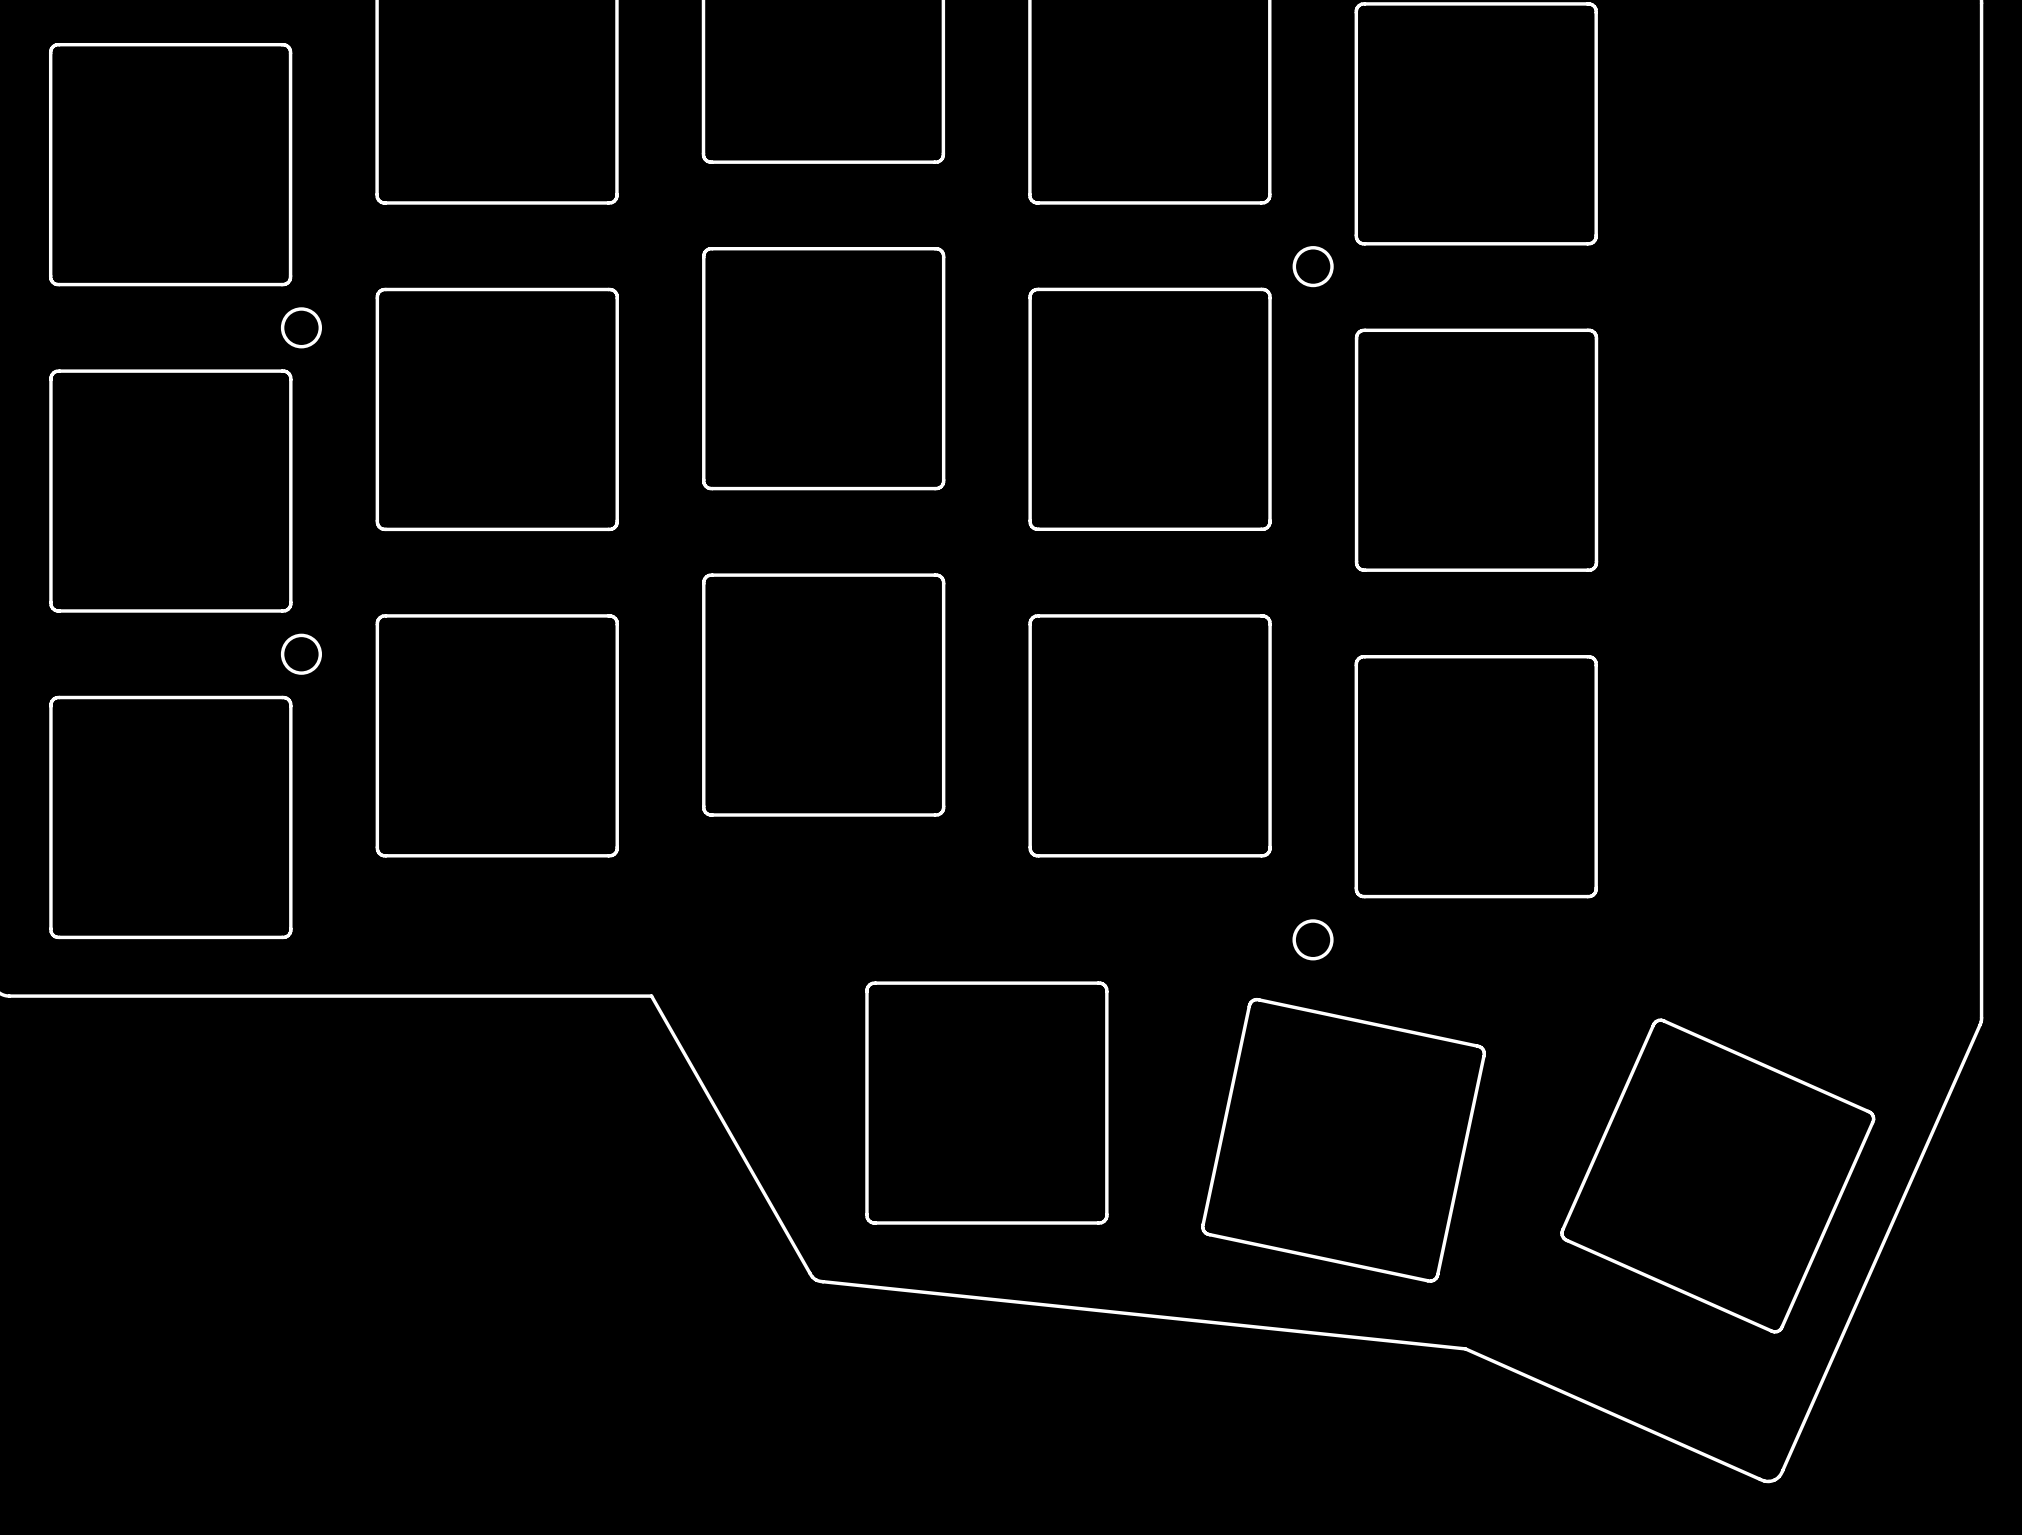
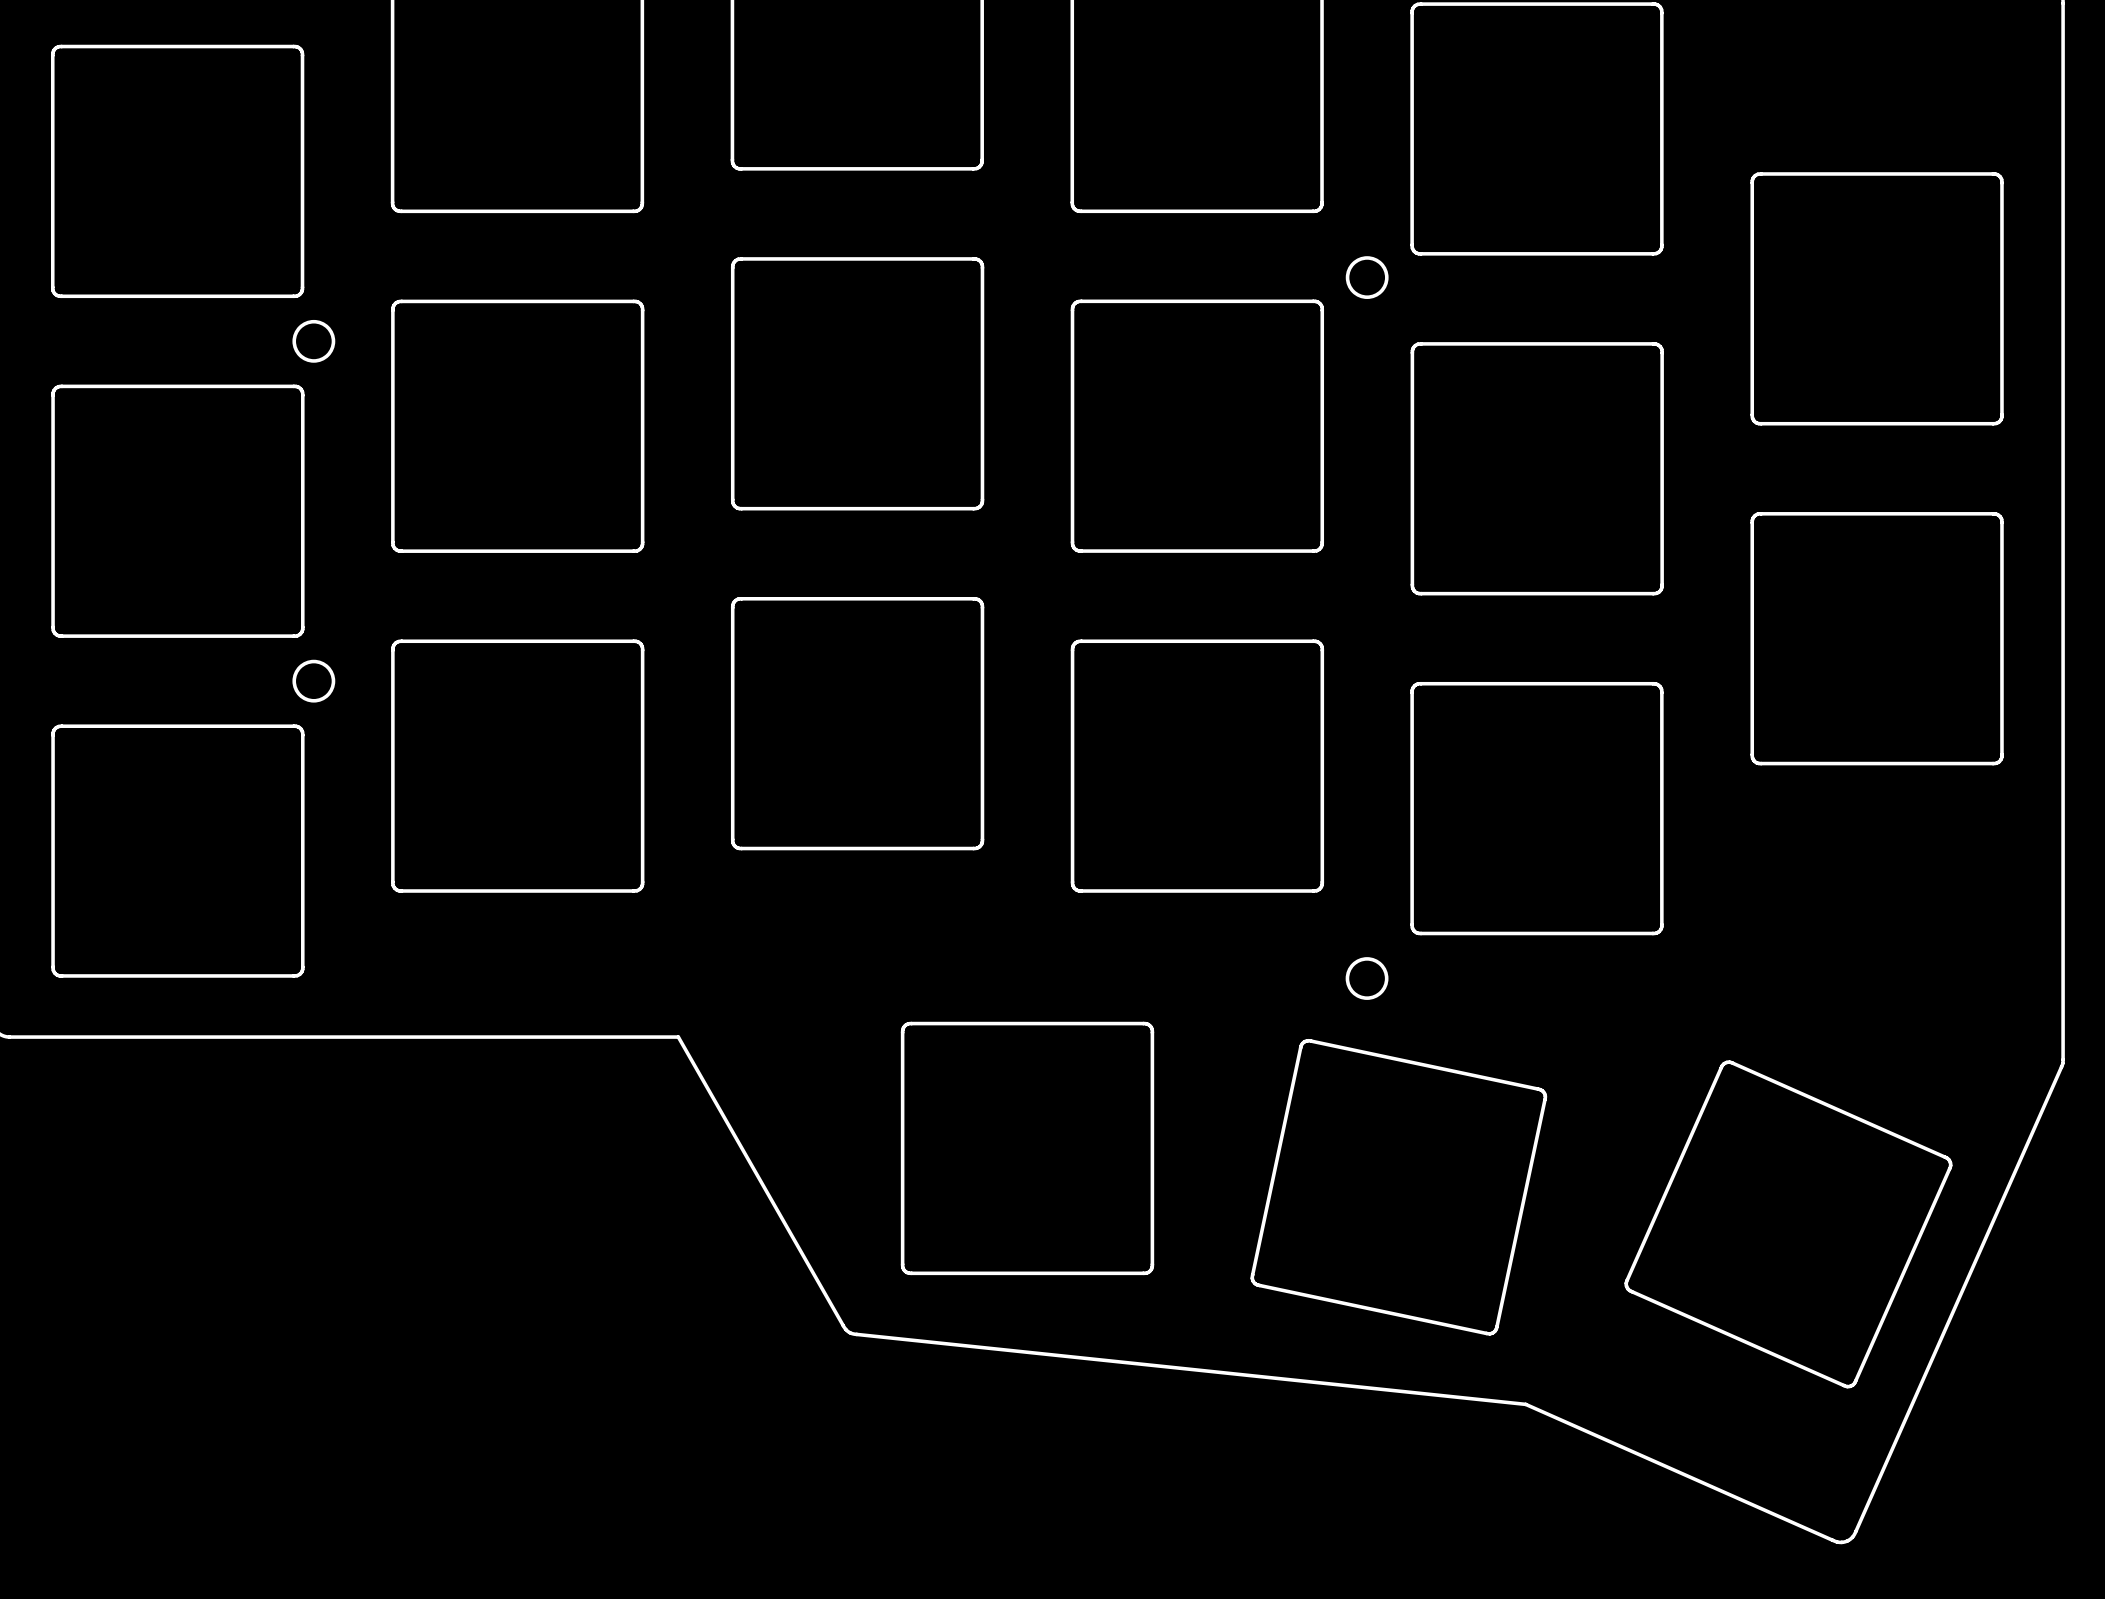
board edge: none -> (1761, 173) (1993, 173) (1999, 176) (2001, 182) (2001, 414) (1999, 421) (1993, 423) (1761, 423) (1754, 421) (1752, 415) (1752, 182) (1754, 176) (1761, 173)
board edge: none -> (1761, 513) (1993, 513) (1999, 516) (2001, 522) (2001, 754) (1999, 761) (1993, 763) (1761, 763) (1754, 761) (1752, 755) (1752, 521) (1754, 515) (1761, 513)

